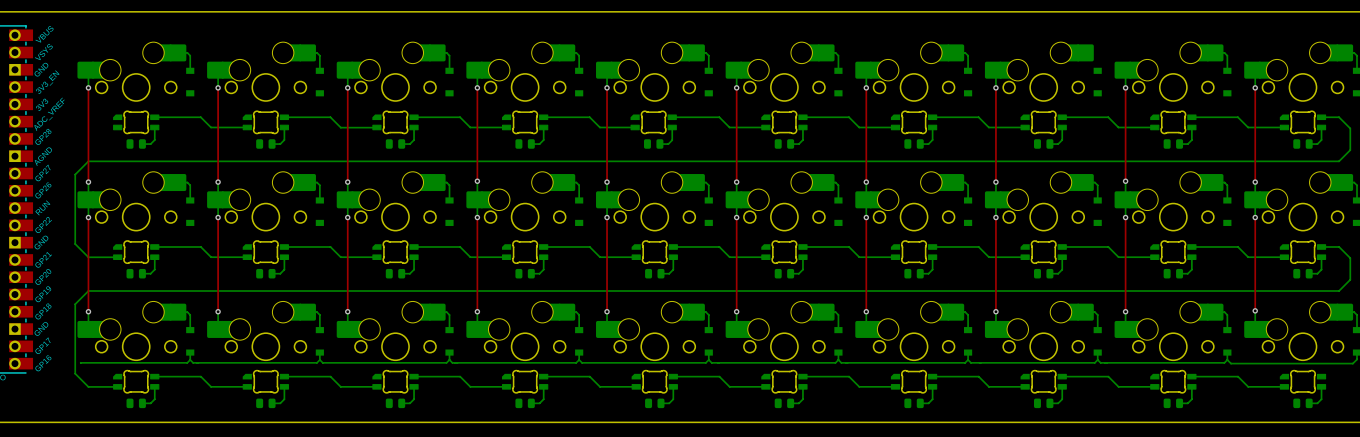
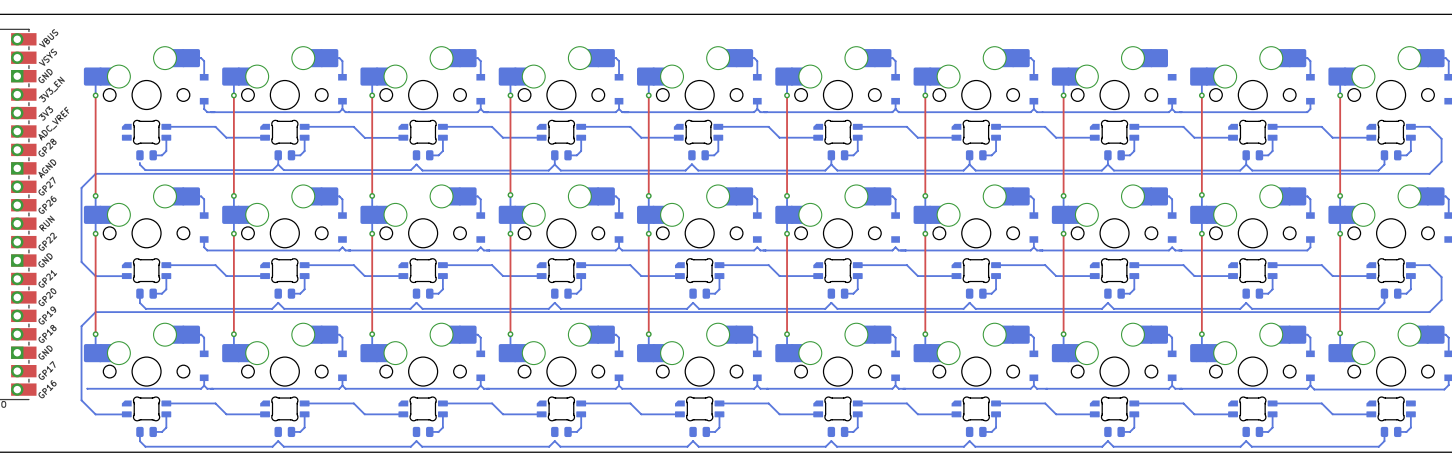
bottom track: none -> (204, 101) (204, 109) (207, 112) (339, 112) (342, 109)
bottom track: none -> (342, 101) (342, 109)
bottom track: none -> (480, 101) (480, 109)
bottom track: none -> (619, 101) (619, 109)
bottom track: none -> (757, 101) (757, 109)
bottom track: none -> (895, 101) (895, 109)
bottom track: none -> (1033, 101) (1033, 109)
bottom track: none -> (1172, 101) (1172, 109)
bottom track: none -> (1310, 101) (1310, 109) (1307, 112) (1175, 112) (1172, 109)
bottom track: none -> (342, 109) (345, 112) (477, 112) (480, 109)
bottom track: none -> (480, 109) (483, 112) (615, 112) (619, 109)
bottom track: none -> (619, 109) (622, 112) (754, 112) (757, 109)
bottom track: none -> (757, 109) (760, 112) (892, 112) (895, 109)
bottom track: none -> (895, 109) (898, 112) (1030, 112) (1033, 109)
bottom track: none -> (1033, 109) (1037, 112) (1169, 112) (1172, 109)
bottom track: none -> (278, 155) (278, 164)
bottom track: none -> (554, 155) (554, 164)
bottom track: none -> (831, 155) (831, 164)
bottom track: none -> (969, 155) (969, 164)
bottom track: none -> (1107, 155) (1107, 164)
bottom track: none -> (1246, 155) (1246, 164)
bottom track: none -> (1384, 155) (1384, 164) (1378, 170) (1252, 170) (1246, 164)
bottom track: none -> (139, 162) (145, 170) (272, 170) (278, 164)
bottom track: none -> (278, 164) (283, 170) (410, 170) (416, 164) (422, 170) (548, 170) (554, 164)
bottom track: none -> (554, 164) (560, 170) (685, 170) (691, 164) (698, 170) (825, 170) (831, 164)
bottom track: none -> (831, 164) (837, 170) (963, 170) (969, 164)
bottom track: none -> (969, 164) (975, 170) (1101, 170) (1107, 164)
bottom track: none -> (1107, 164) (1113, 170) (1240, 170) (1246, 164)
bottom track: none -> (204, 239) (204, 247) (207, 250) (339, 250) (342, 247) (345, 250) (477, 250) (480, 247) (483, 250) (615, 250) (619, 247)
bottom track: none -> (619, 239) (619, 247)
bottom track: none -> (1033, 239) (1033, 247)
bottom track: none -> (1310, 239) (1310, 247) (1307, 250) (1175, 250) (1172, 247) (1169, 250) (1037, 250) (1033, 247)
bottom track: none -> (619, 247) (622, 250) (754, 250) (757, 247) (760, 250) (892, 250) (895, 247) (898, 250) (1030, 250) (1033, 247)
bottom track: none -> (139, 293) (139, 302) (145, 308) (272, 308) (278, 302) (284, 308) (410, 308) (416, 302) (422, 308) (548, 308) (554, 302) (560, 308) (687, 308) (693, 302) (699, 308) (825, 308) (831, 302) (837, 308) (963, 308) (969, 302) (975, 308) (1102, 308) (1107, 302) (1113, 308) (1240, 308) (1246, 302) (1252, 308) (1378, 308) (1384, 302) (1384, 293)
bottom track: none -> (139, 431) (139, 441) (145, 446) (272, 446) (278, 441) (283, 446) (410, 446) (416, 441) (422, 446) (549, 446) (554, 441) (560, 446) (687, 446) (693, 441) (698, 446) (825, 446) (831, 441) (836, 446) (964, 446) (969, 441) (975, 446) (1102, 446) (1107, 441) (1113, 446) (1240, 446) (1246, 441) (1251, 446) (1378, 446) (1384, 441) (1384, 431)

